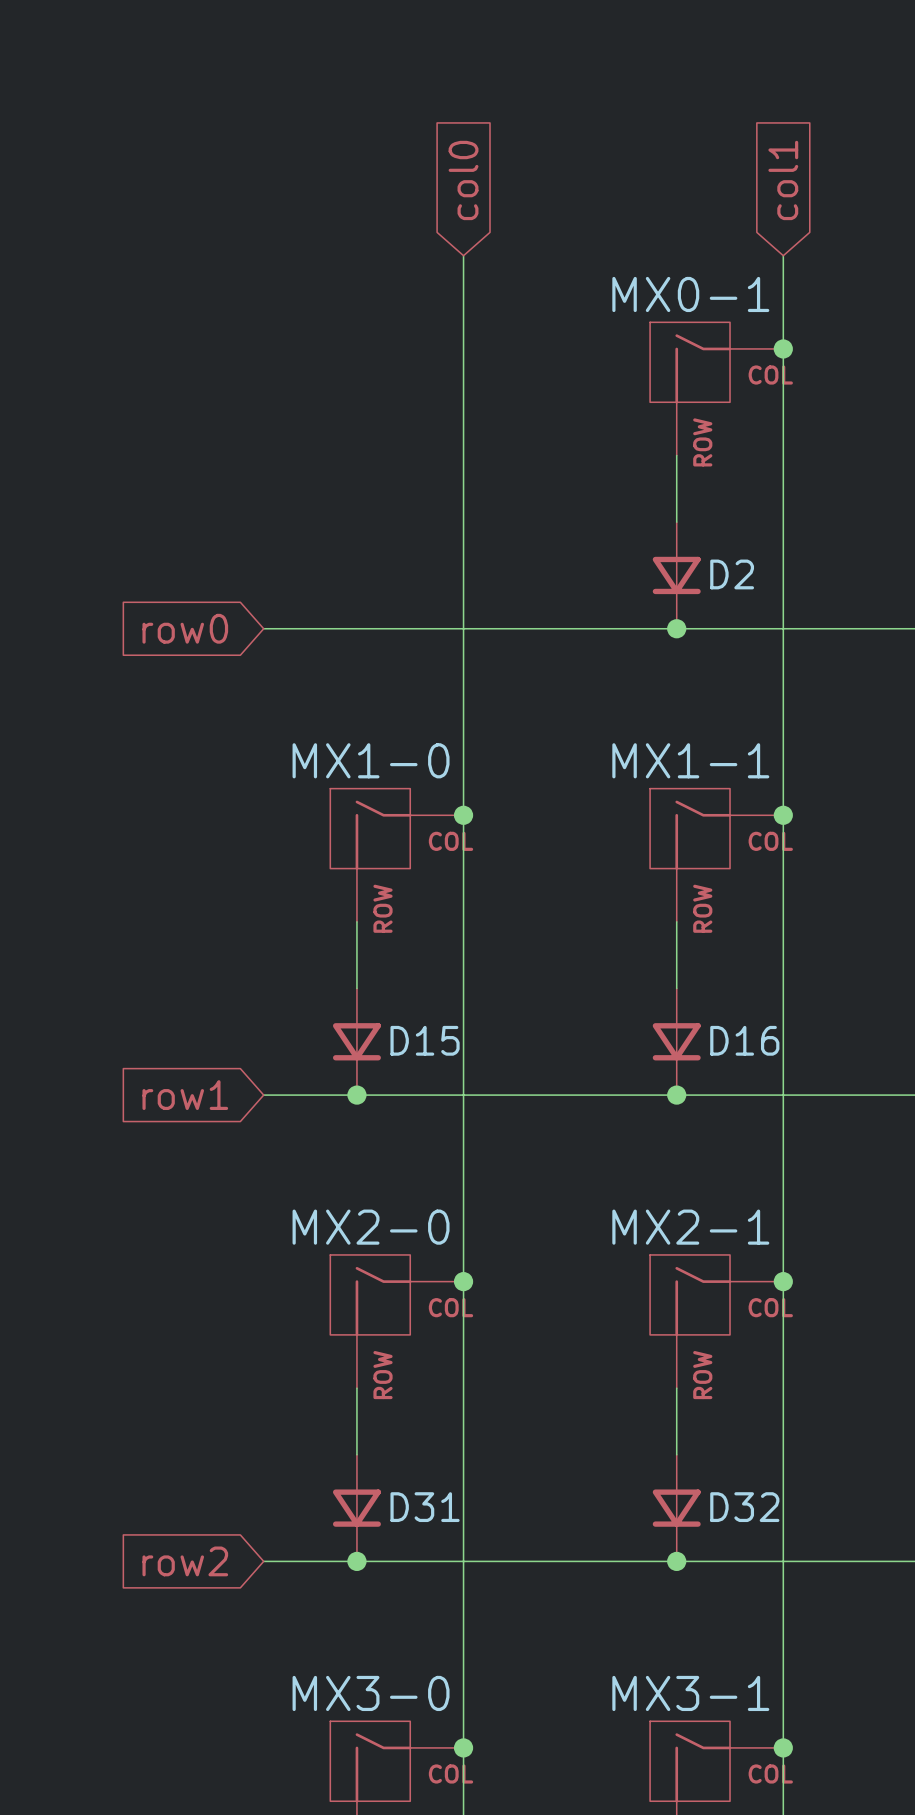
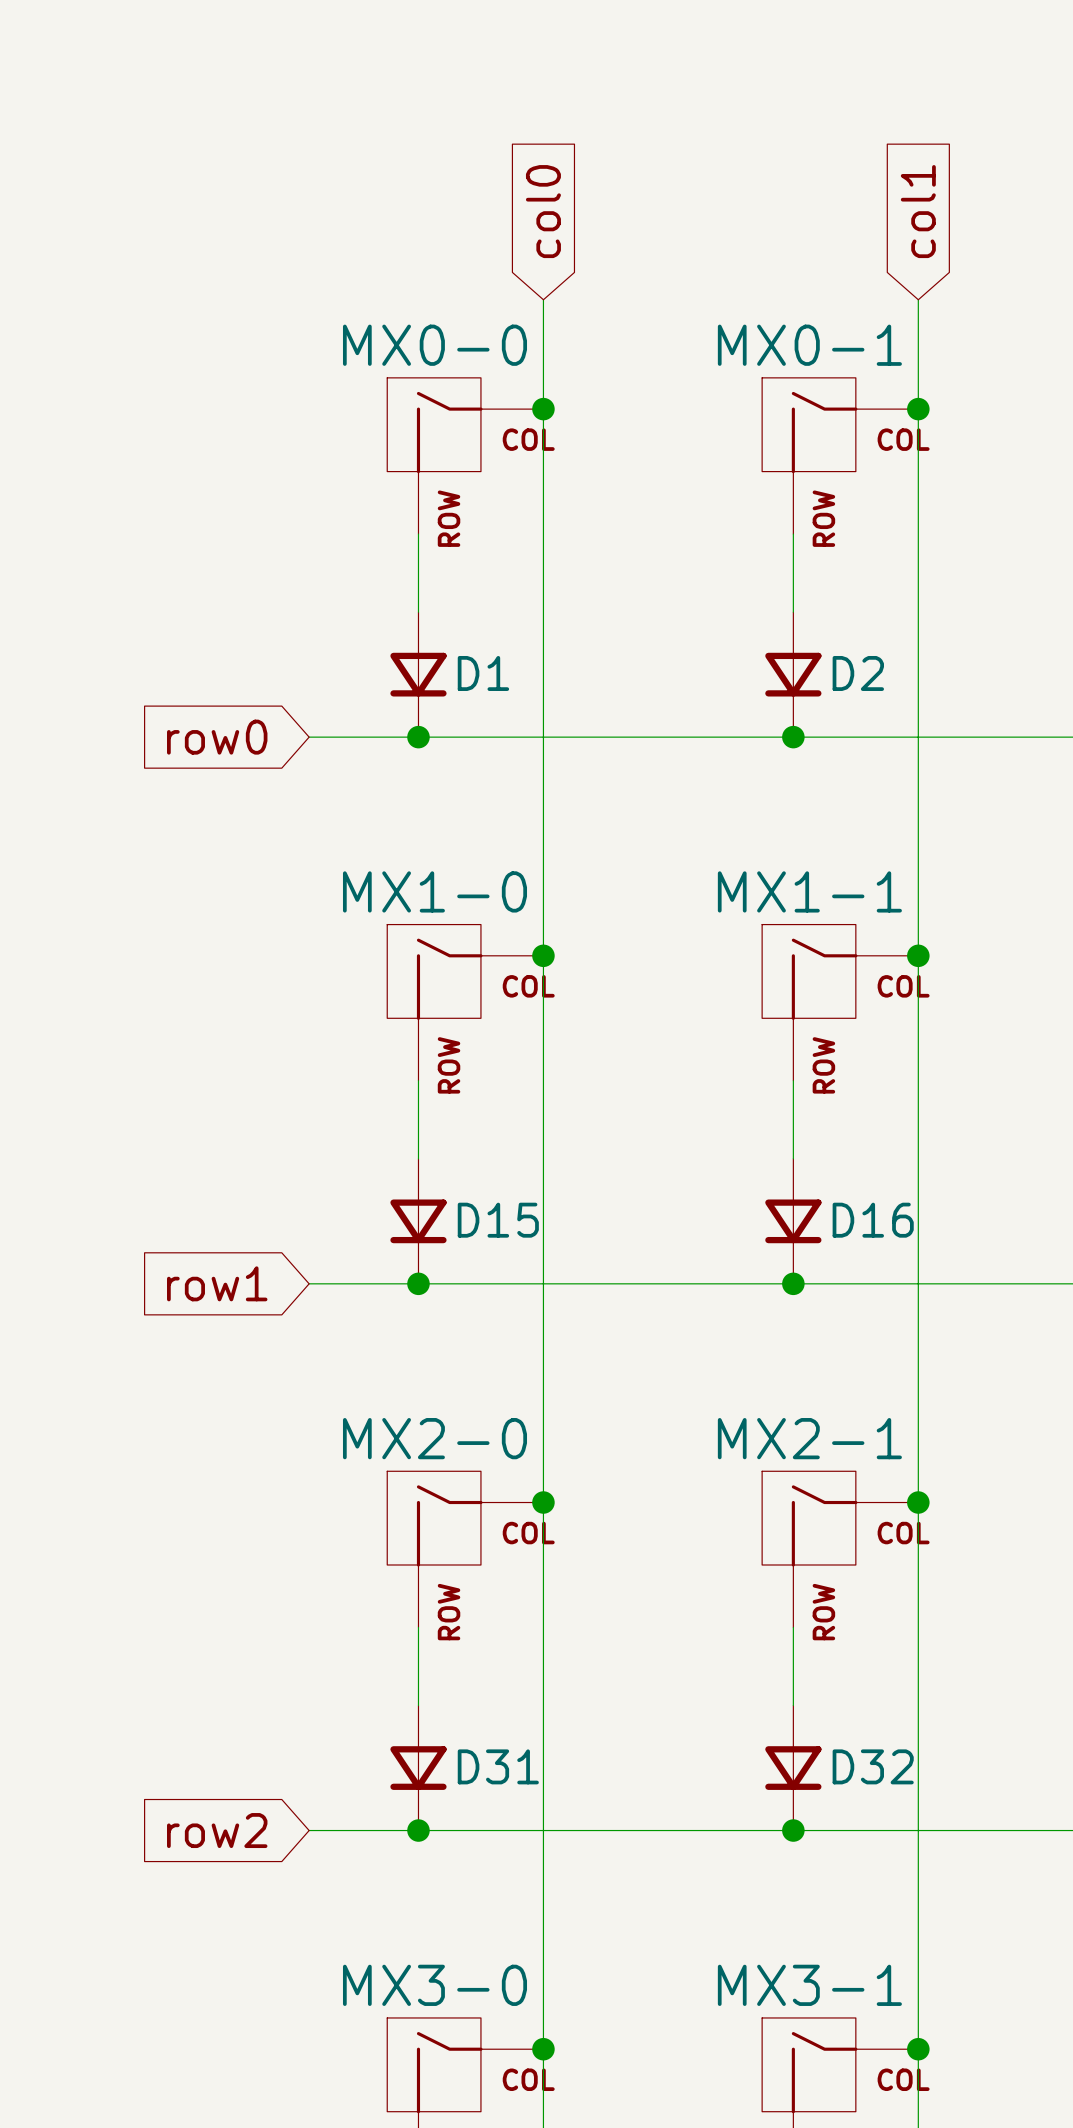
junction: none -> (543, 409)
MX0-0: none -> (465, 455)
wire: none -> (418, 534) (418, 612)
D1: none -> (418, 674)
junction: none -> (418, 737)

